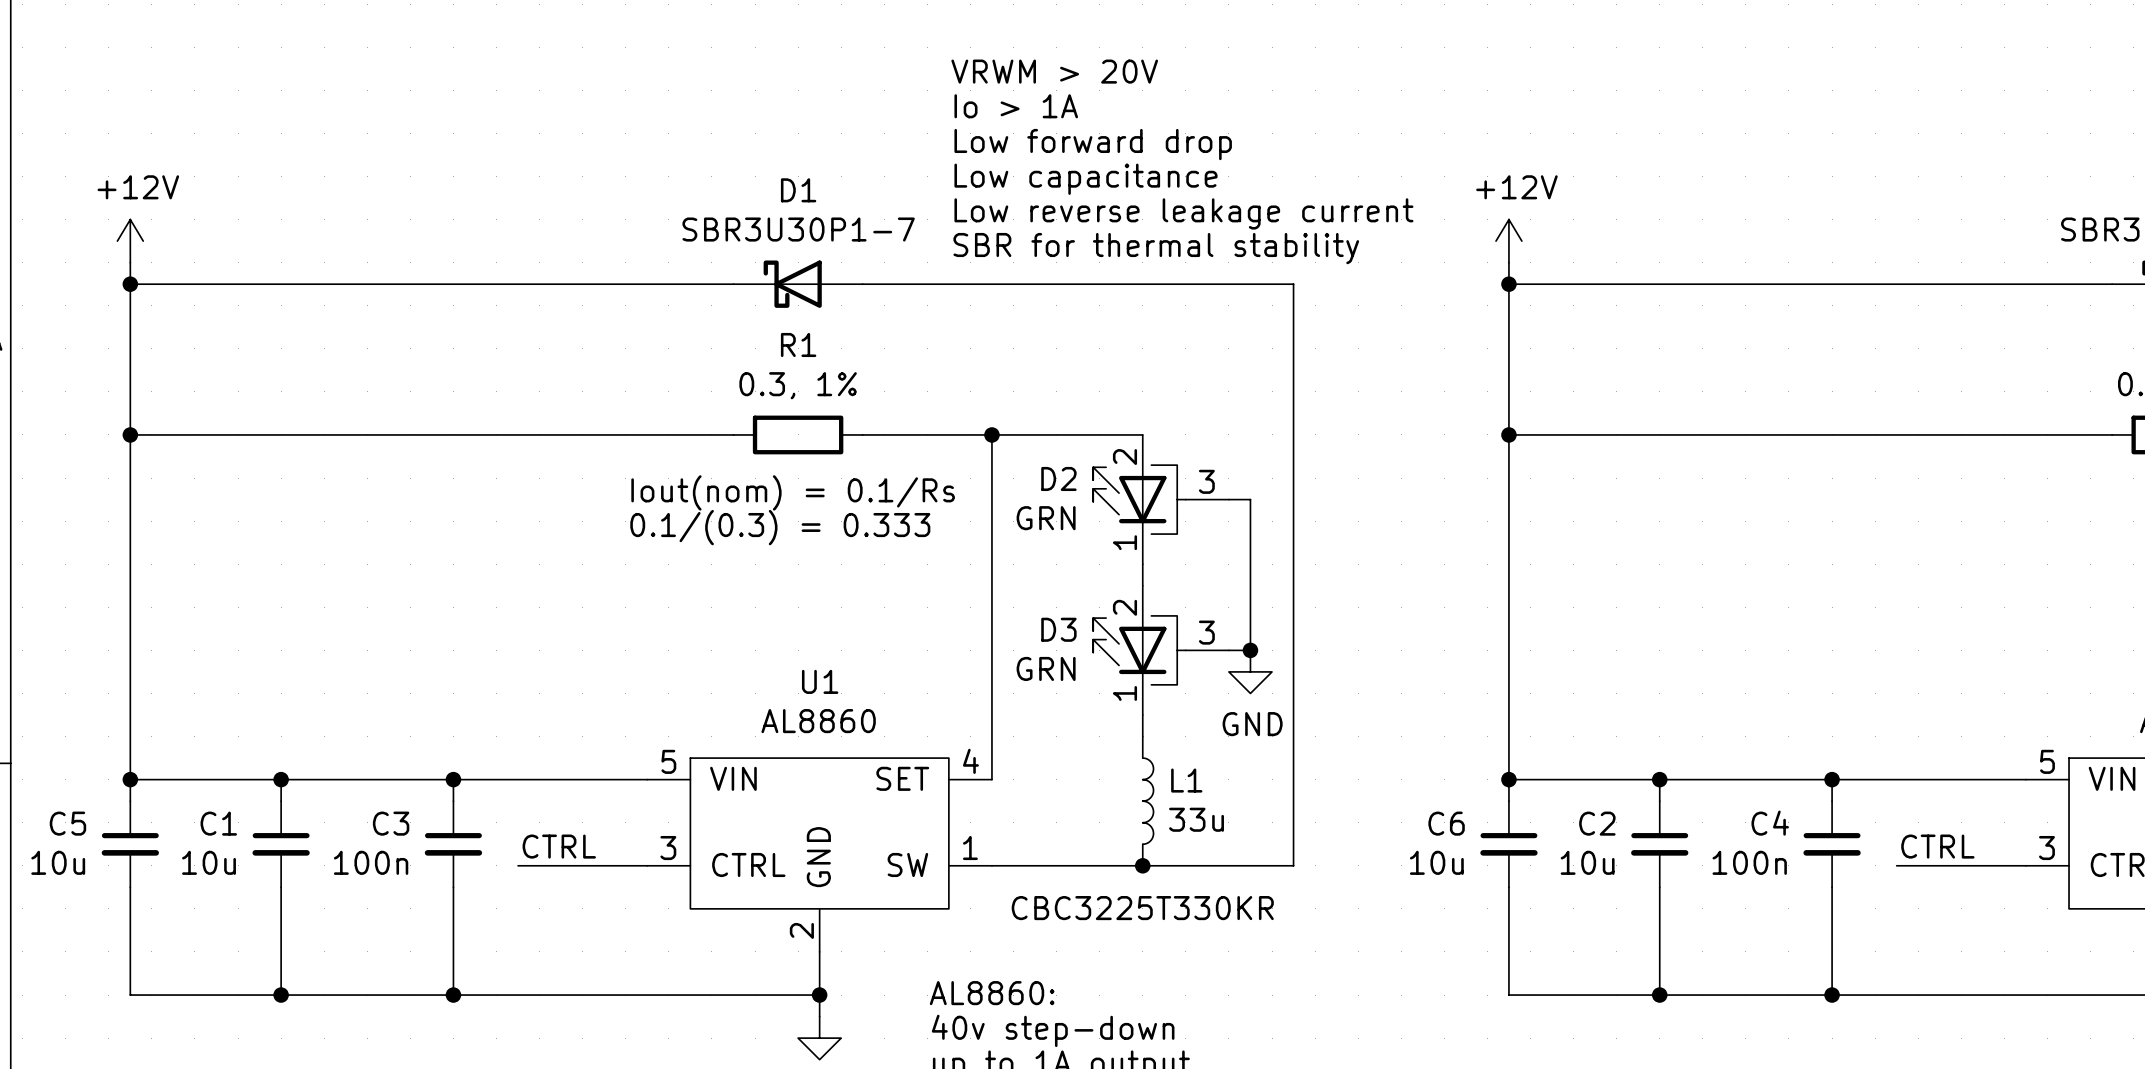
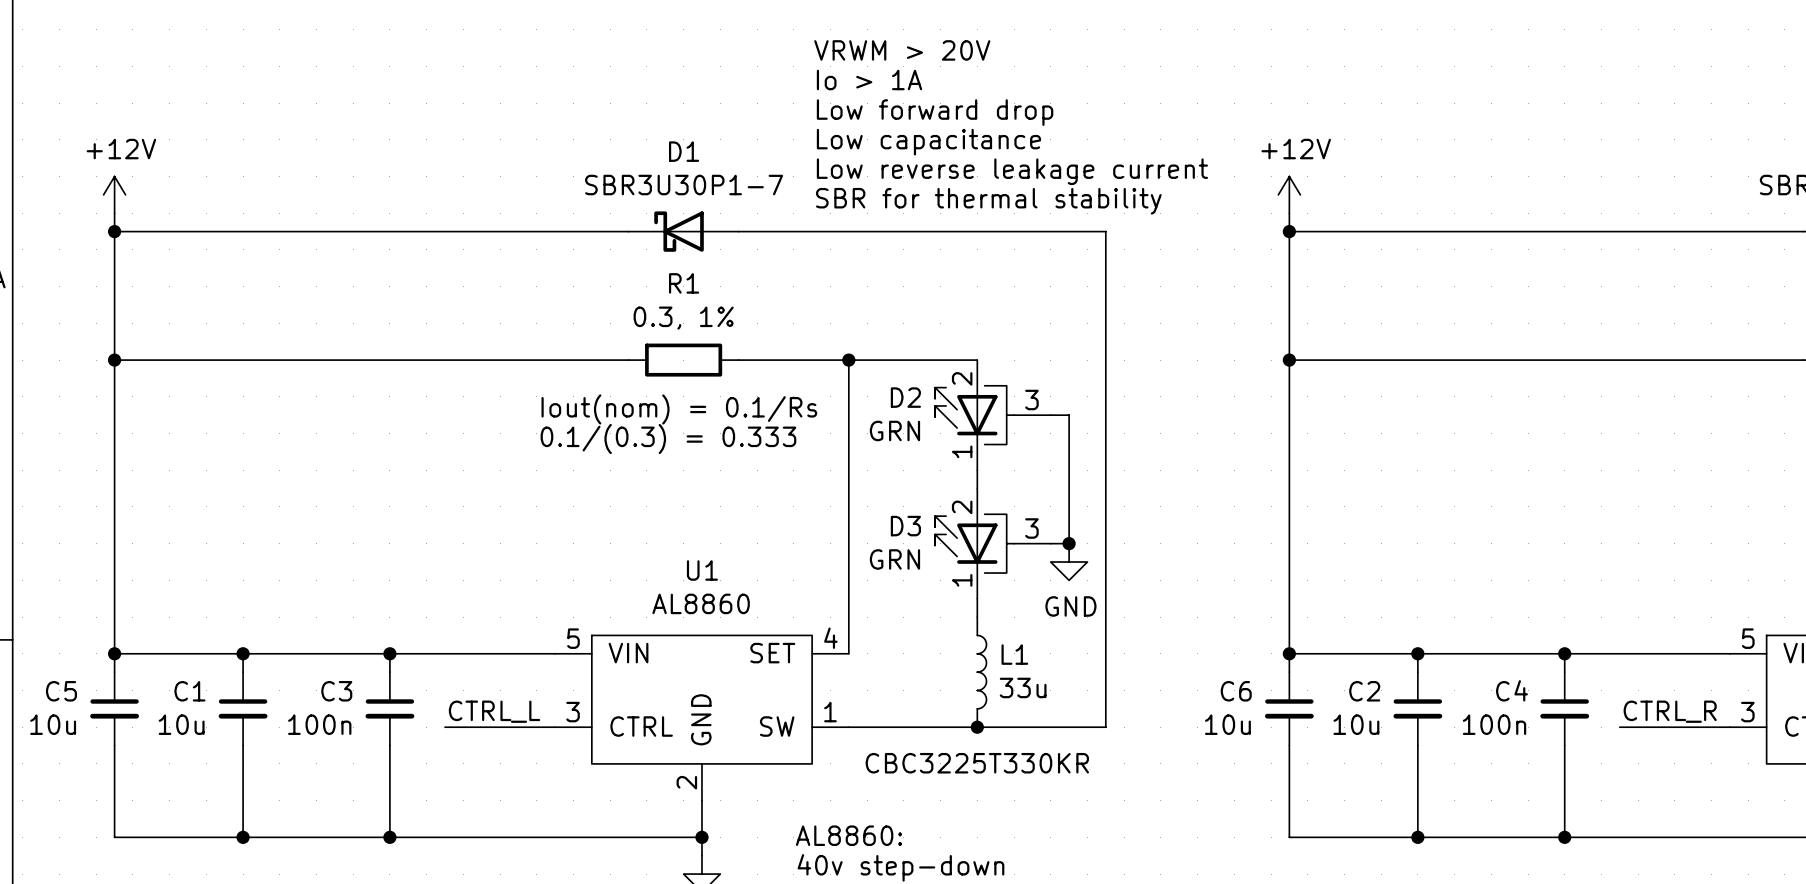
label: CTRL (559, 846) -> CTRL_L (494, 711)
label: CTRL (1937, 846) -> CTRL_R (1670, 711)

